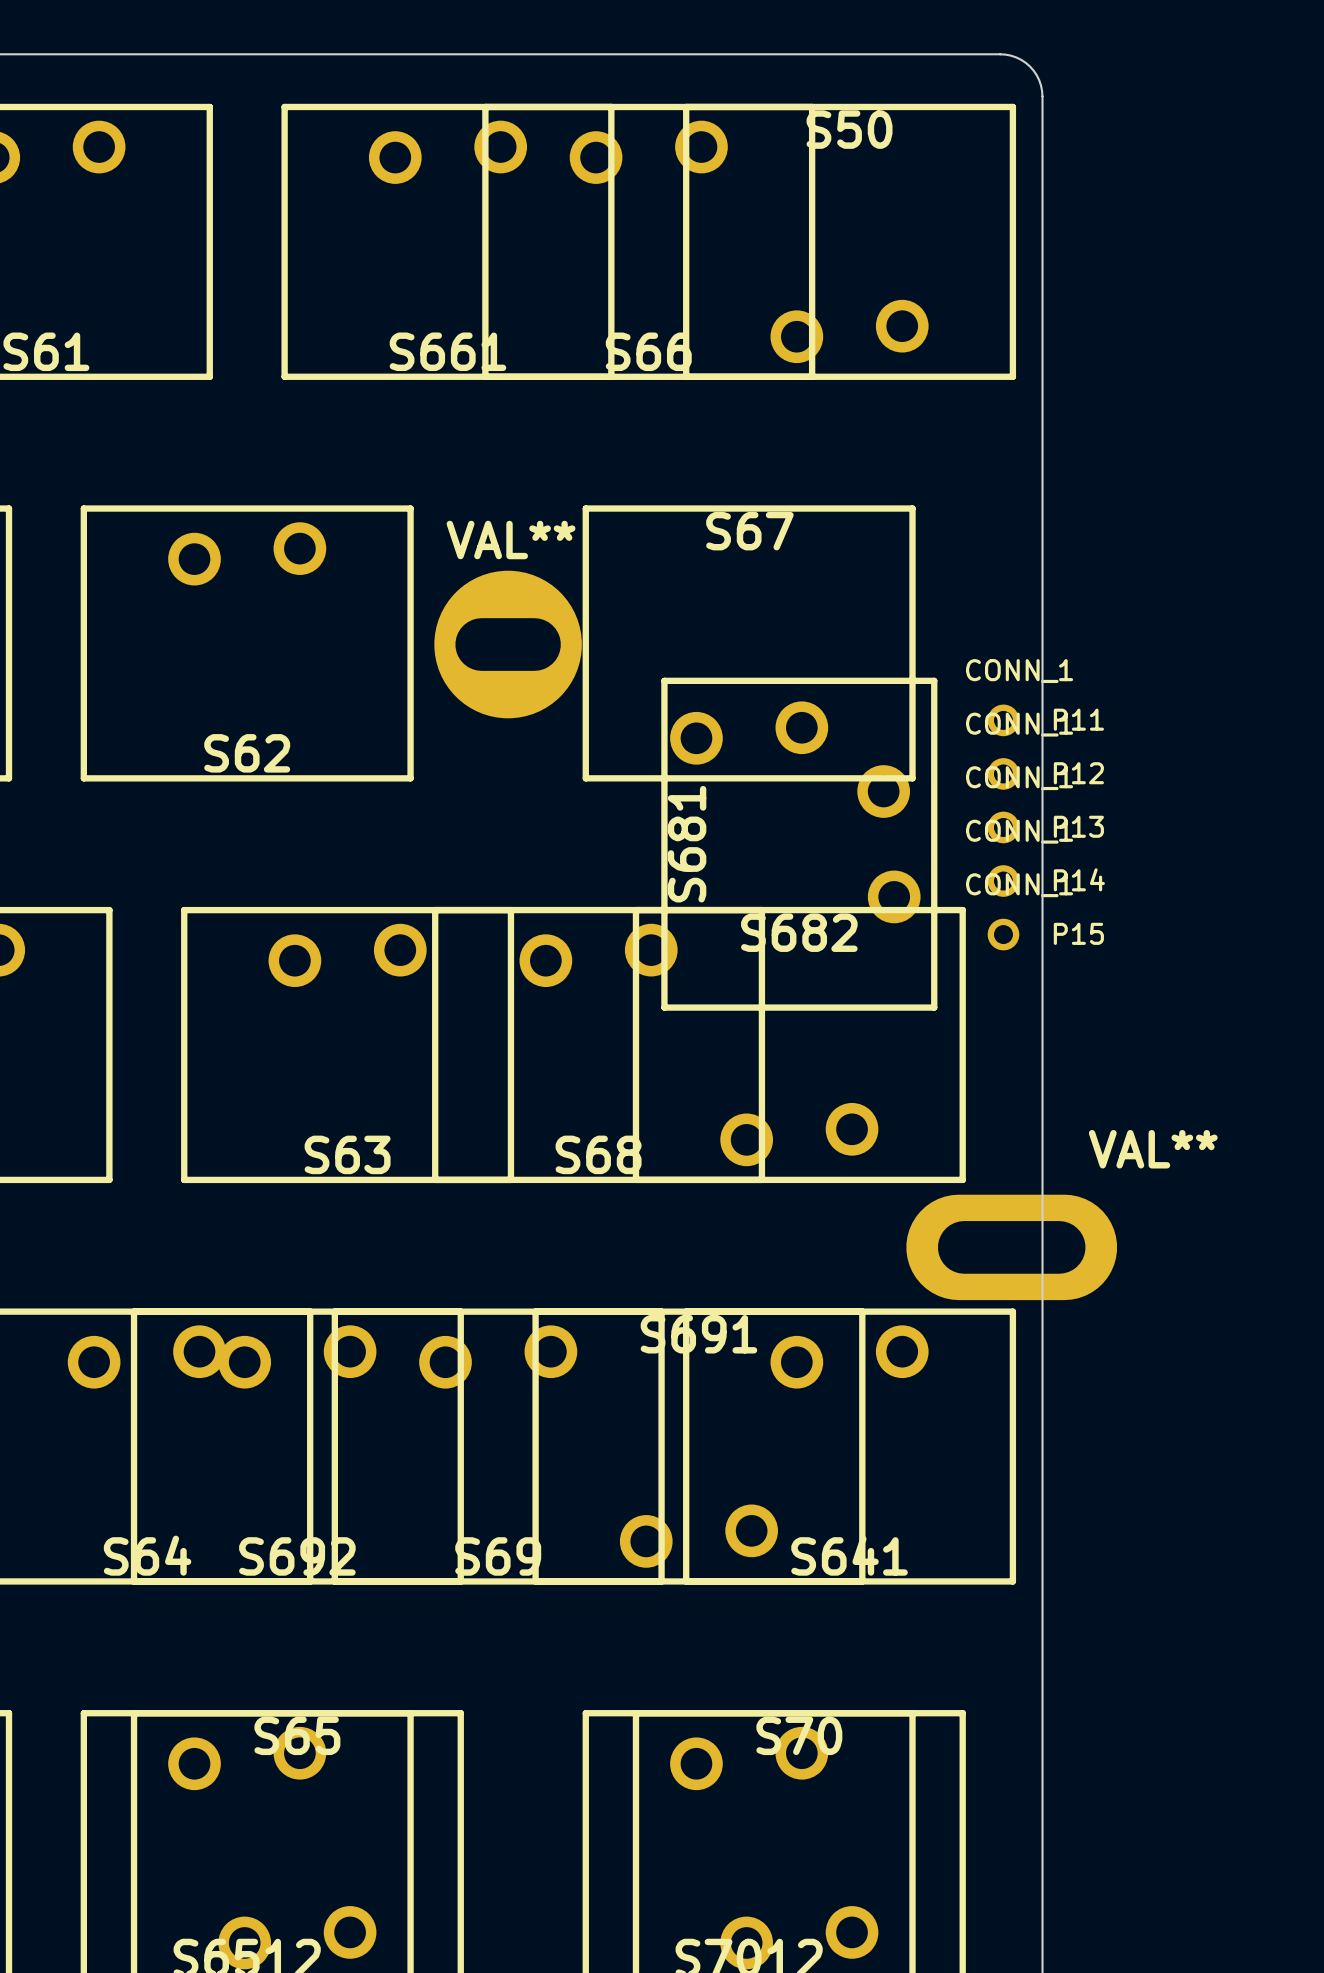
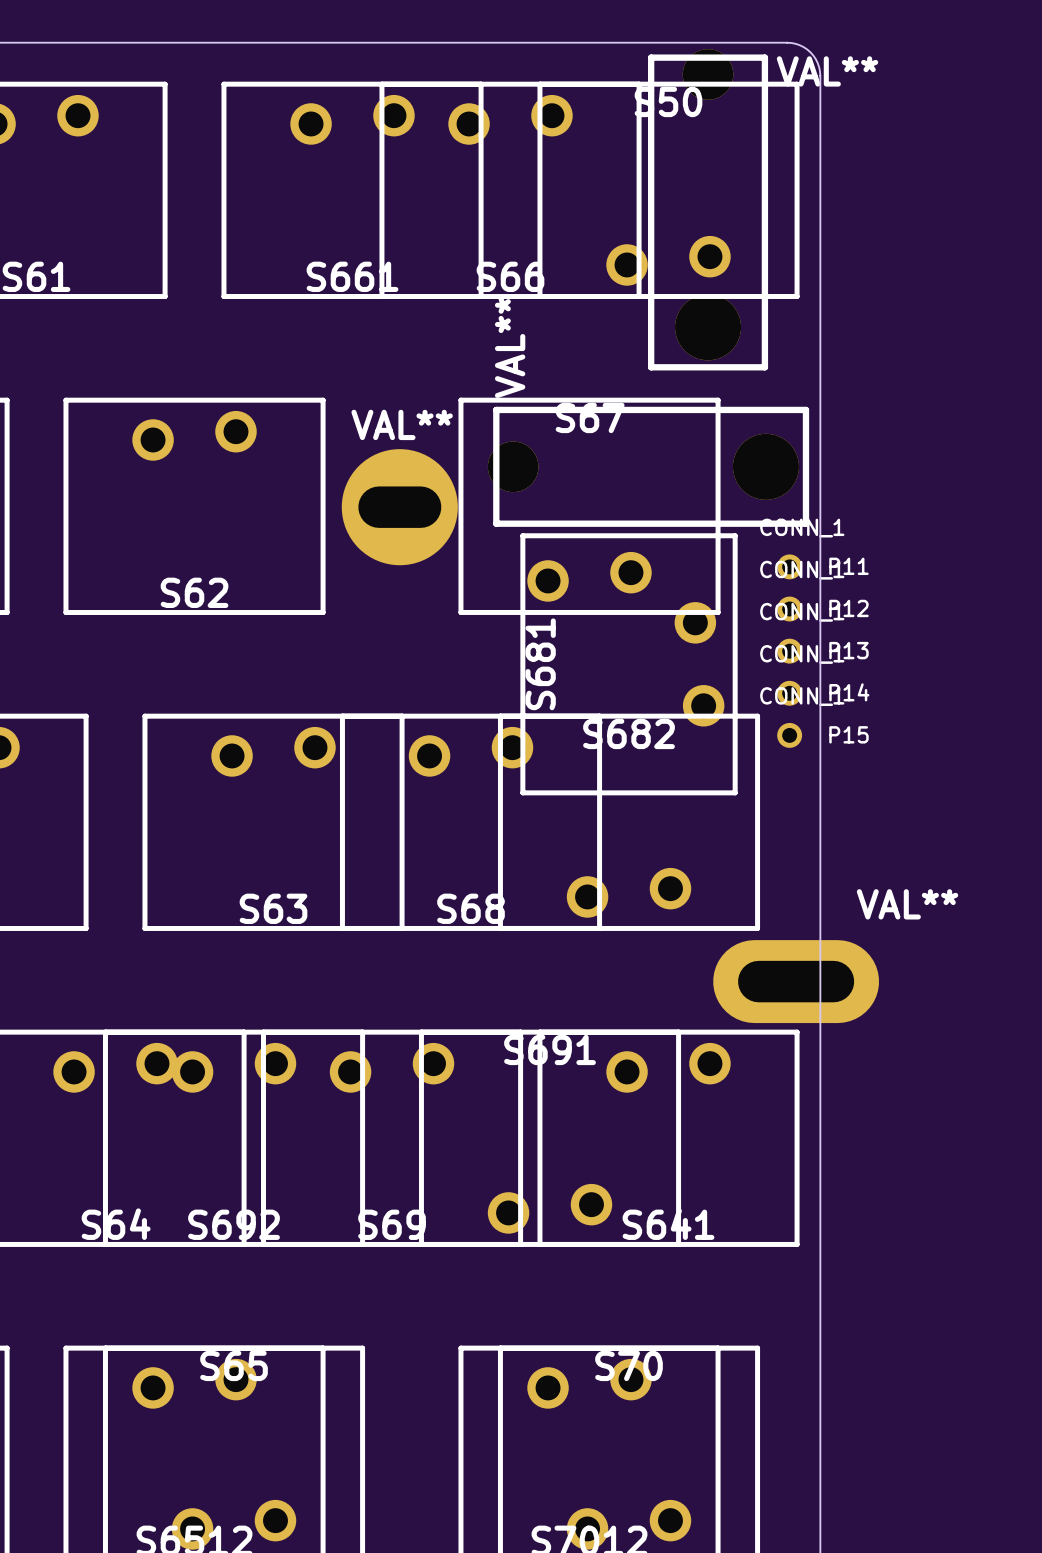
part: none -> VAL** (708, 209)
part: none -> VAL** (648, 466)

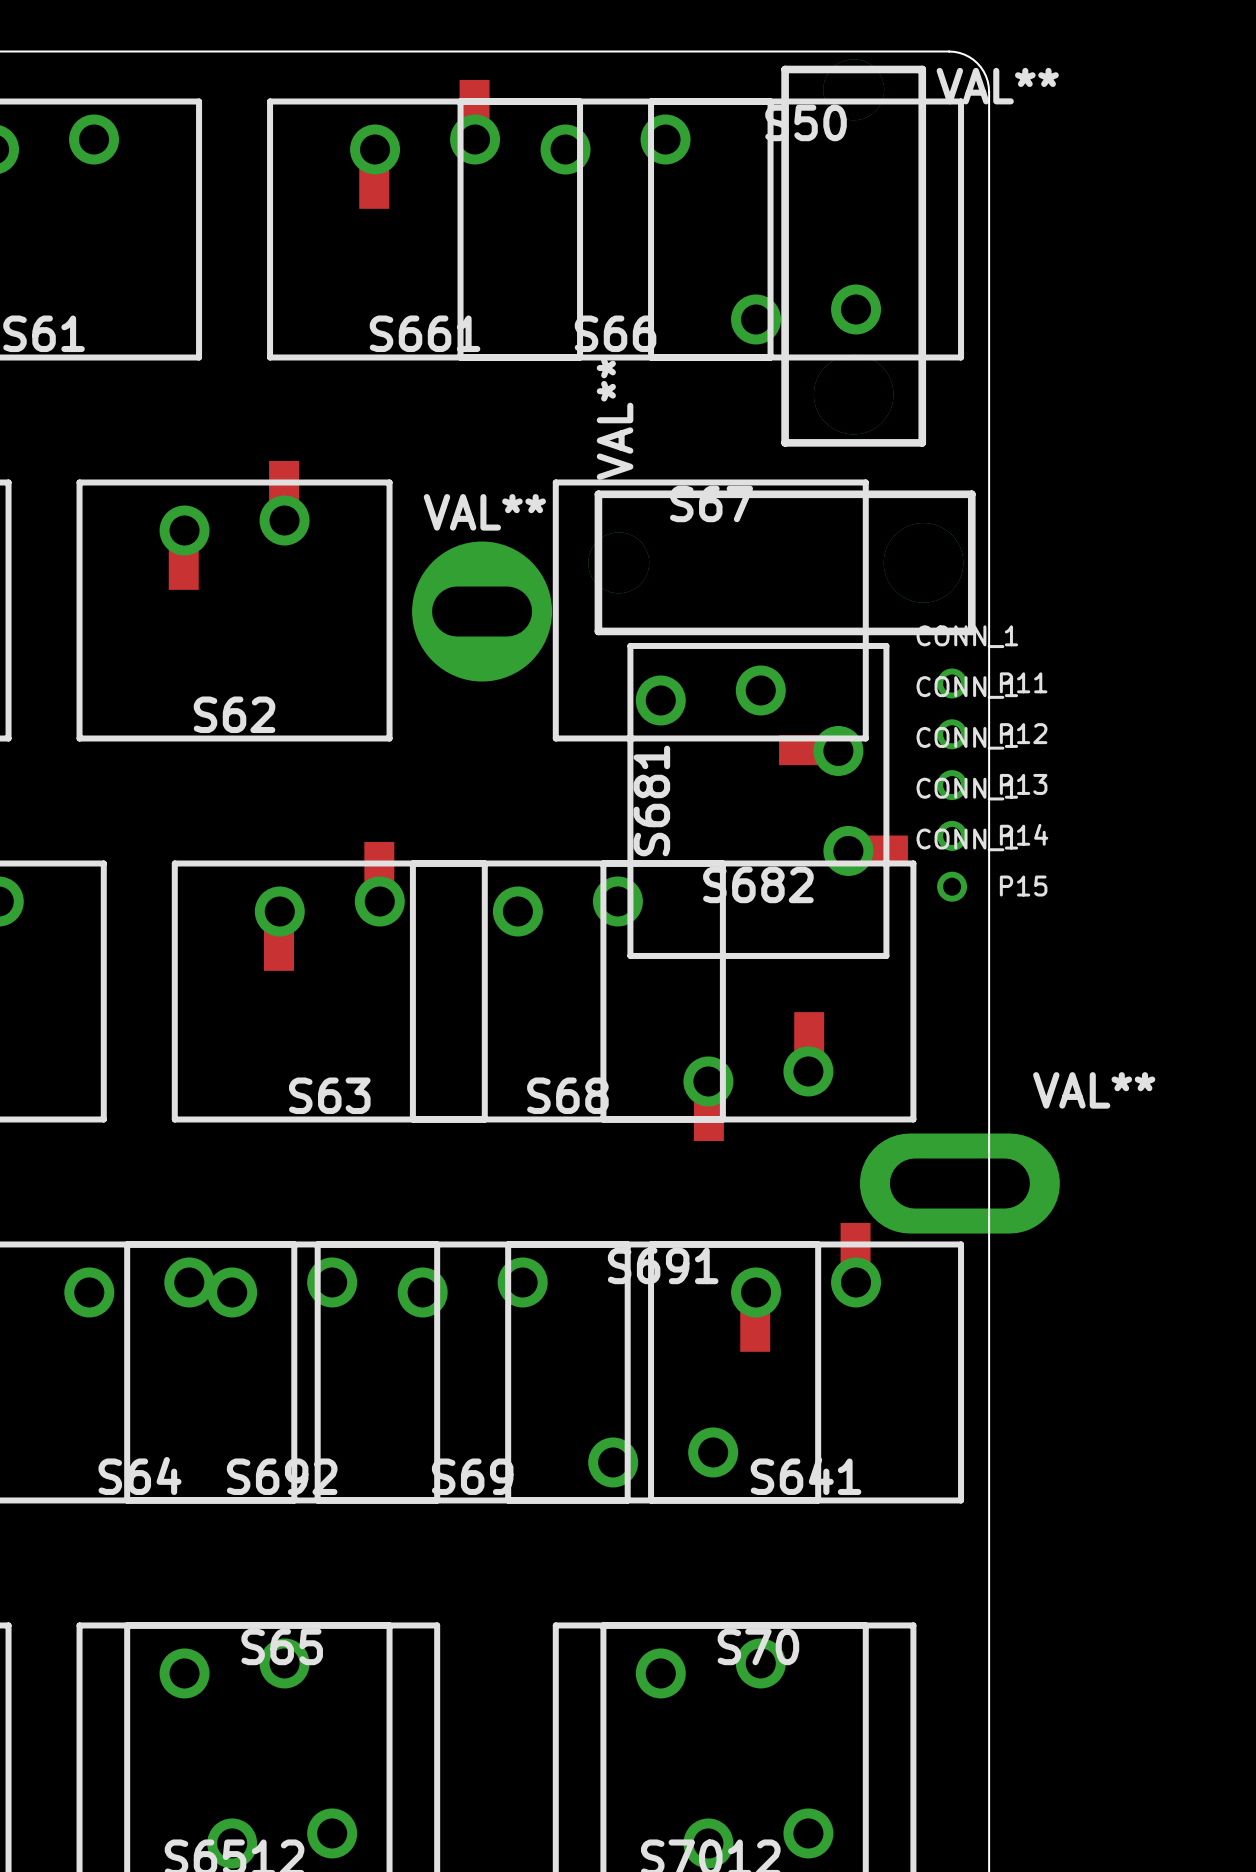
S661 footprint: [221, 81, 484, 299] -> [267, 79, 584, 361]
S62 footprint: [63, 397, 326, 615] -> [76, 460, 393, 742]
S681 footprint: [520, 533, 738, 796] -> [627, 642, 908, 959]
S63 footprint: [142, 713, 405, 931] -> [171, 841, 488, 1123]
S682 footprint: [497, 713, 761, 931] -> [600, 860, 917, 1142]
S641 footprint: [537, 1029, 800, 1247] -> [648, 1222, 965, 1504]

